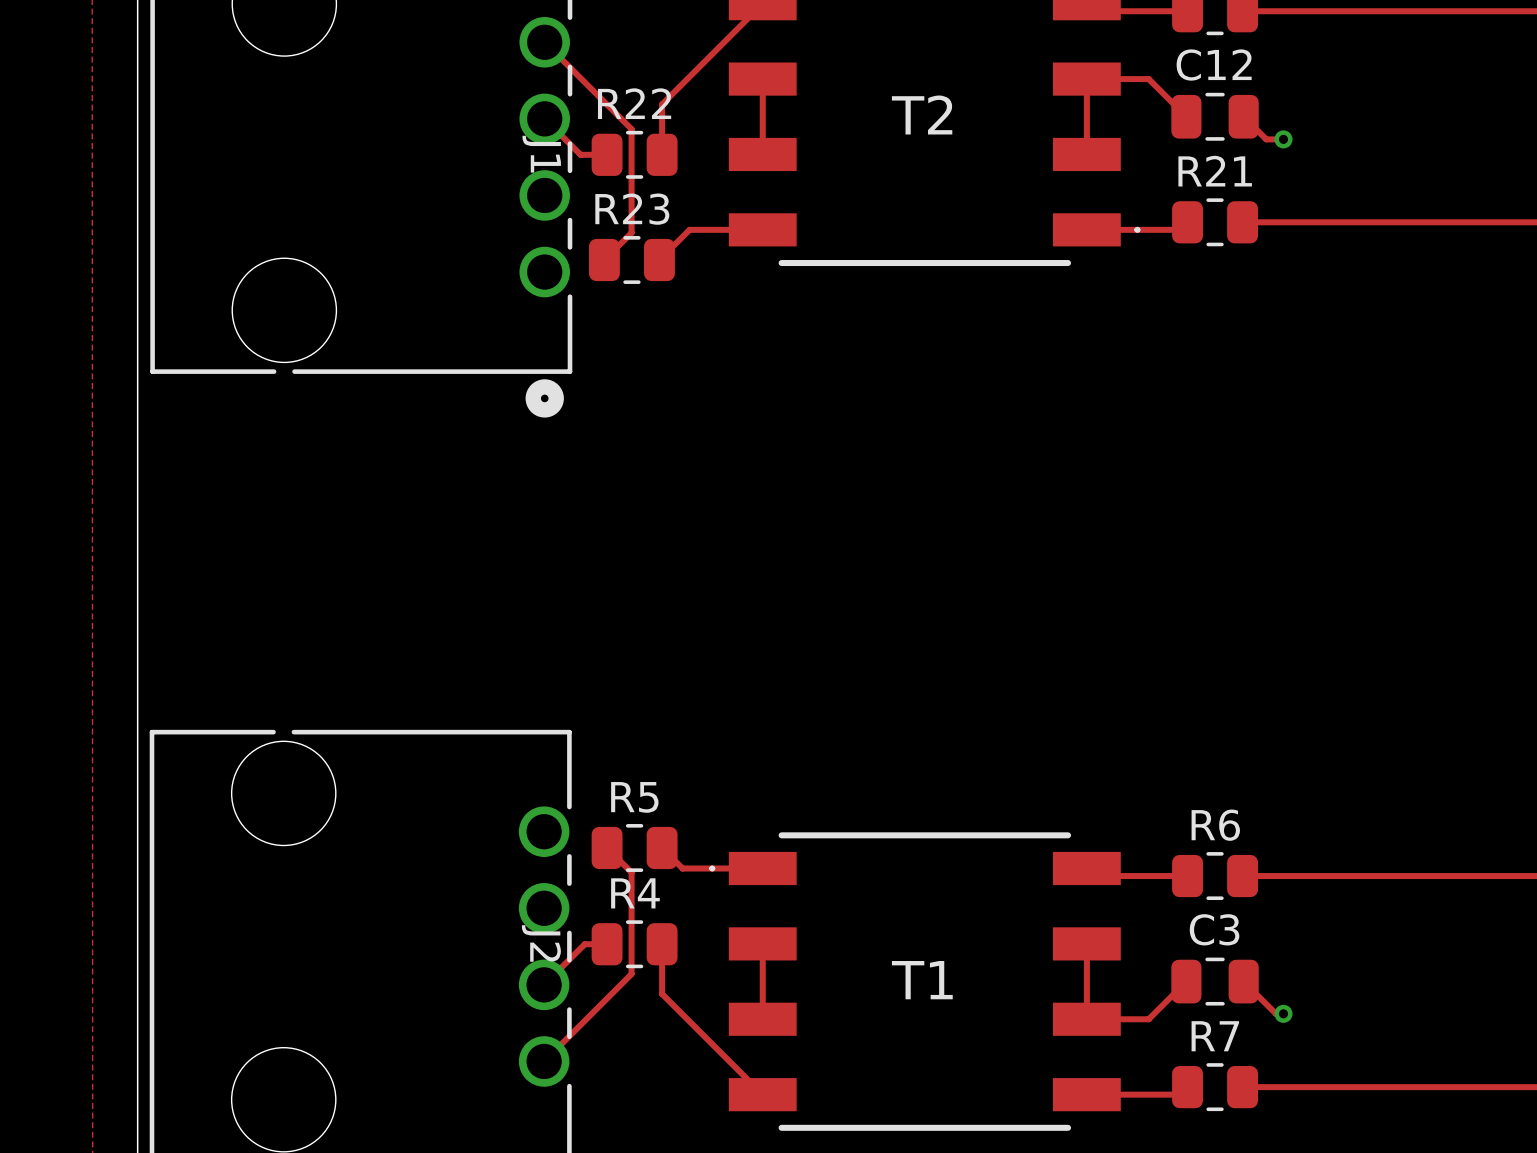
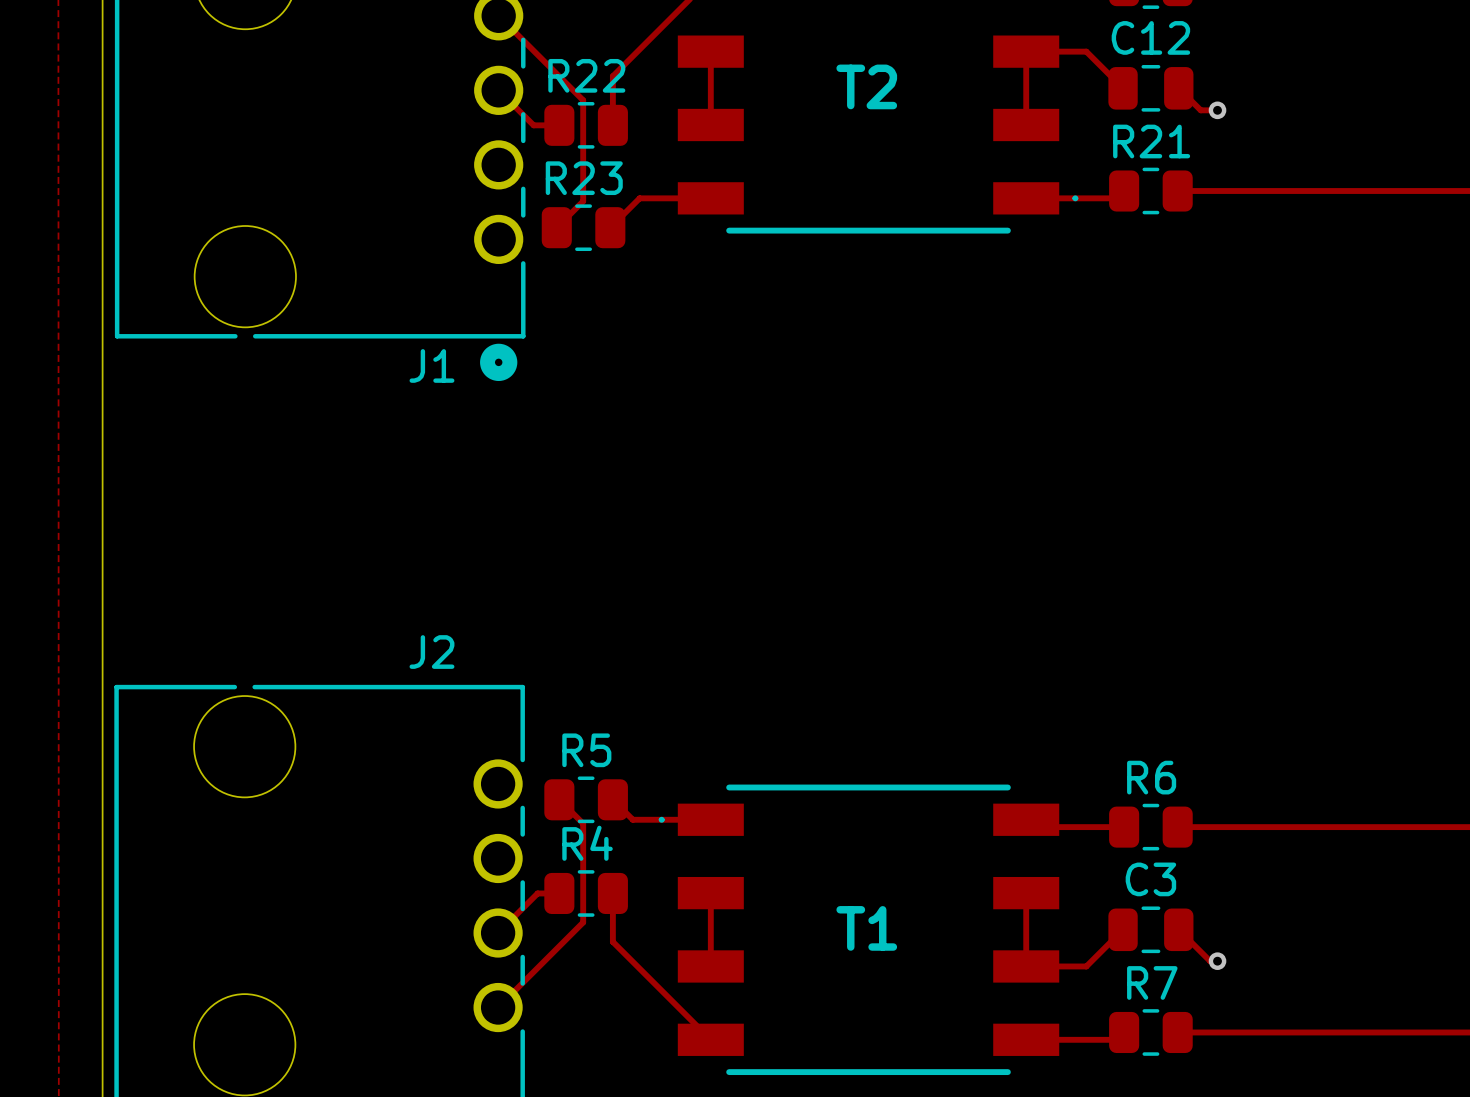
J1 name rotation: 0° (541, 154) -> 90° counterclockwise (431, 365)
J1 name position: J1 (541, 154) -> J1 (431, 365)
J2 name rotation: 0° (541, 943) -> 90° counterclockwise (431, 652)
J2 name position: J2 (541, 943) -> J2 (431, 652)

